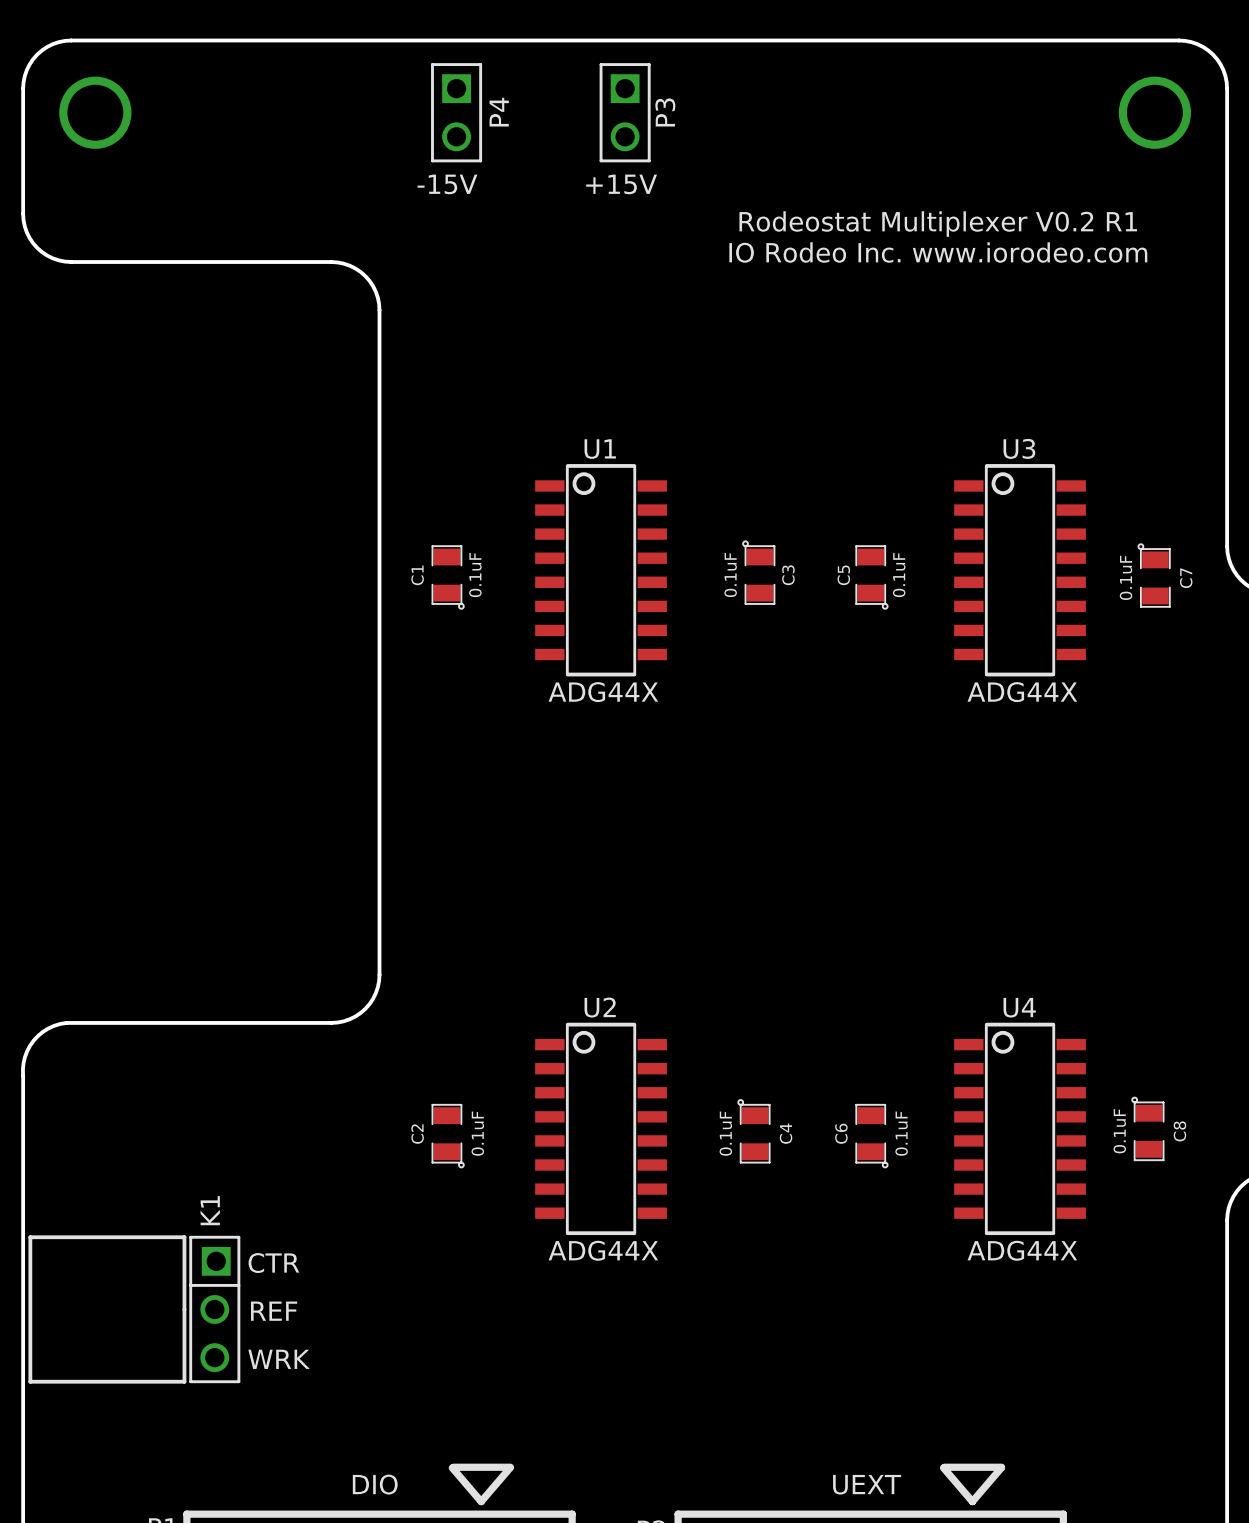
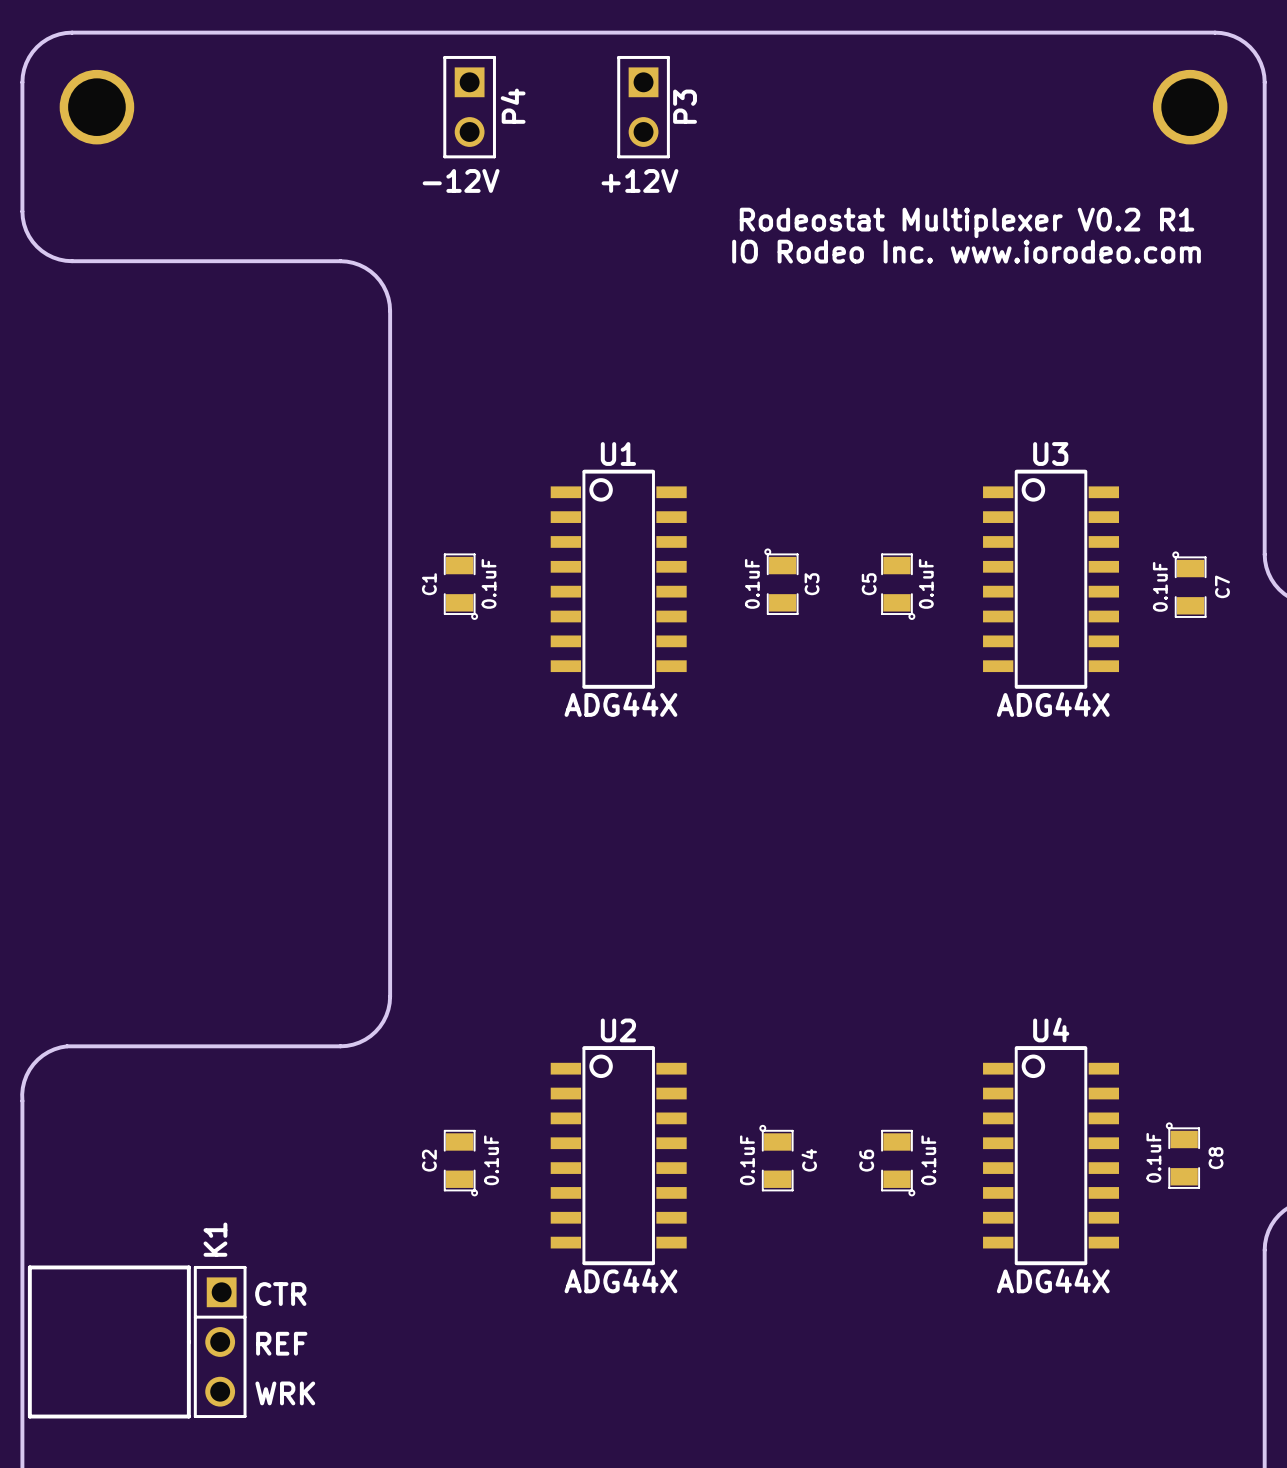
text: -15V (447, 184) -> -12V (461, 180)
text: +15V (621, 184) -> +12V (639, 180)

